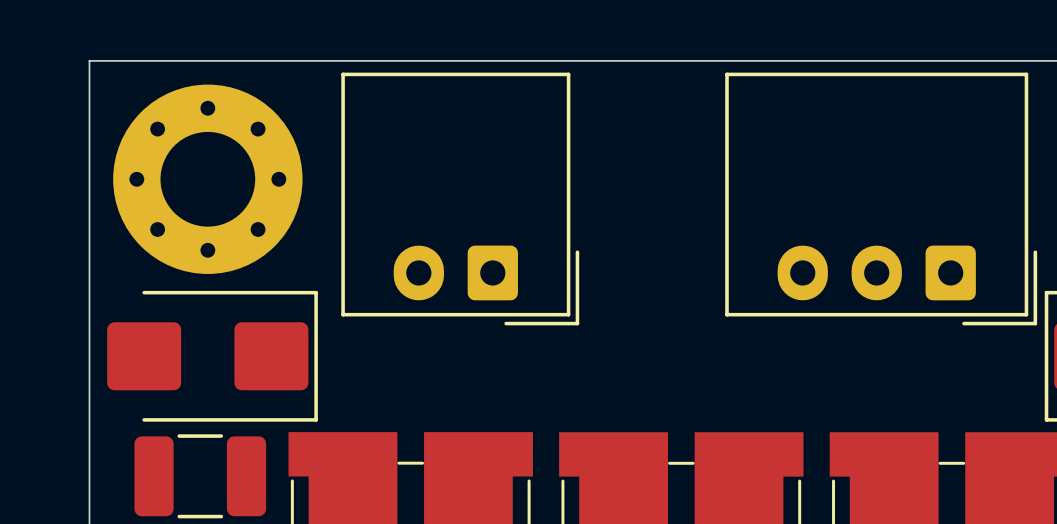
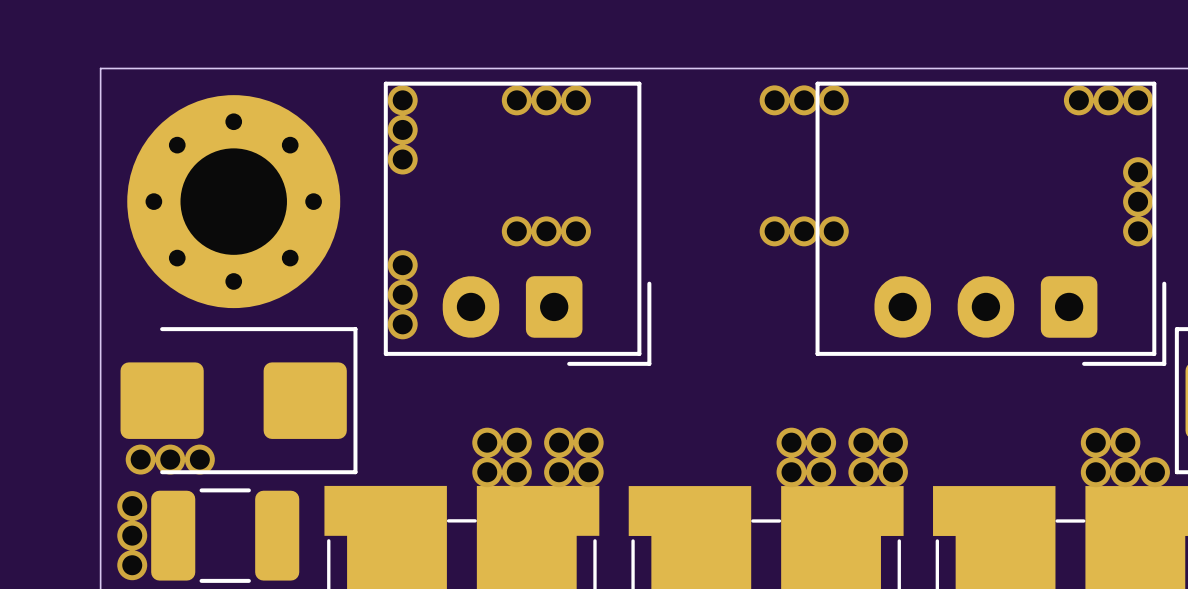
via: none -> (402, 100)
via: none -> (516, 100)
via: none -> (546, 100)
via: none -> (575, 100)
via: none -> (774, 100)
via: none -> (804, 100)
via: none -> (833, 100)
via: none -> (1078, 100)
via: none -> (1108, 100)
via: none -> (1138, 100)
via: none -> (402, 129)
via: none -> (402, 159)
via: none -> (1138, 172)
via: none -> (1138, 201)
via: none -> (516, 231)
via: none -> (546, 231)
via: none -> (575, 231)
via: none -> (774, 231)
via: none -> (804, 231)
via: none -> (833, 231)
via: none -> (1138, 231)
via: none -> (402, 265)
via: none -> (402, 294)
via: none -> (402, 324)
via: none -> (487, 442)
via: none -> (516, 442)
via: none -> (559, 442)
via: none -> (588, 442)
via: none -> (791, 442)
via: none -> (821, 442)
via: none -> (863, 442)
via: none -> (892, 442)
via: none -> (1095, 442)
via: none -> (1125, 442)
via: none -> (140, 459)
via: none -> (170, 459)
via: none -> (199, 459)
via: none -> (487, 472)
via: none -> (516, 472)
via: none -> (559, 472)
via: none -> (588, 472)
via: none -> (791, 472)
via: none -> (821, 472)
via: none -> (863, 472)
via: none -> (892, 472)
via: none -> (1095, 472)
via: none -> (1125, 472)
via: none -> (1154, 472)
via: none -> (132, 506)
via: none -> (132, 535)
via: none -> (132, 565)

